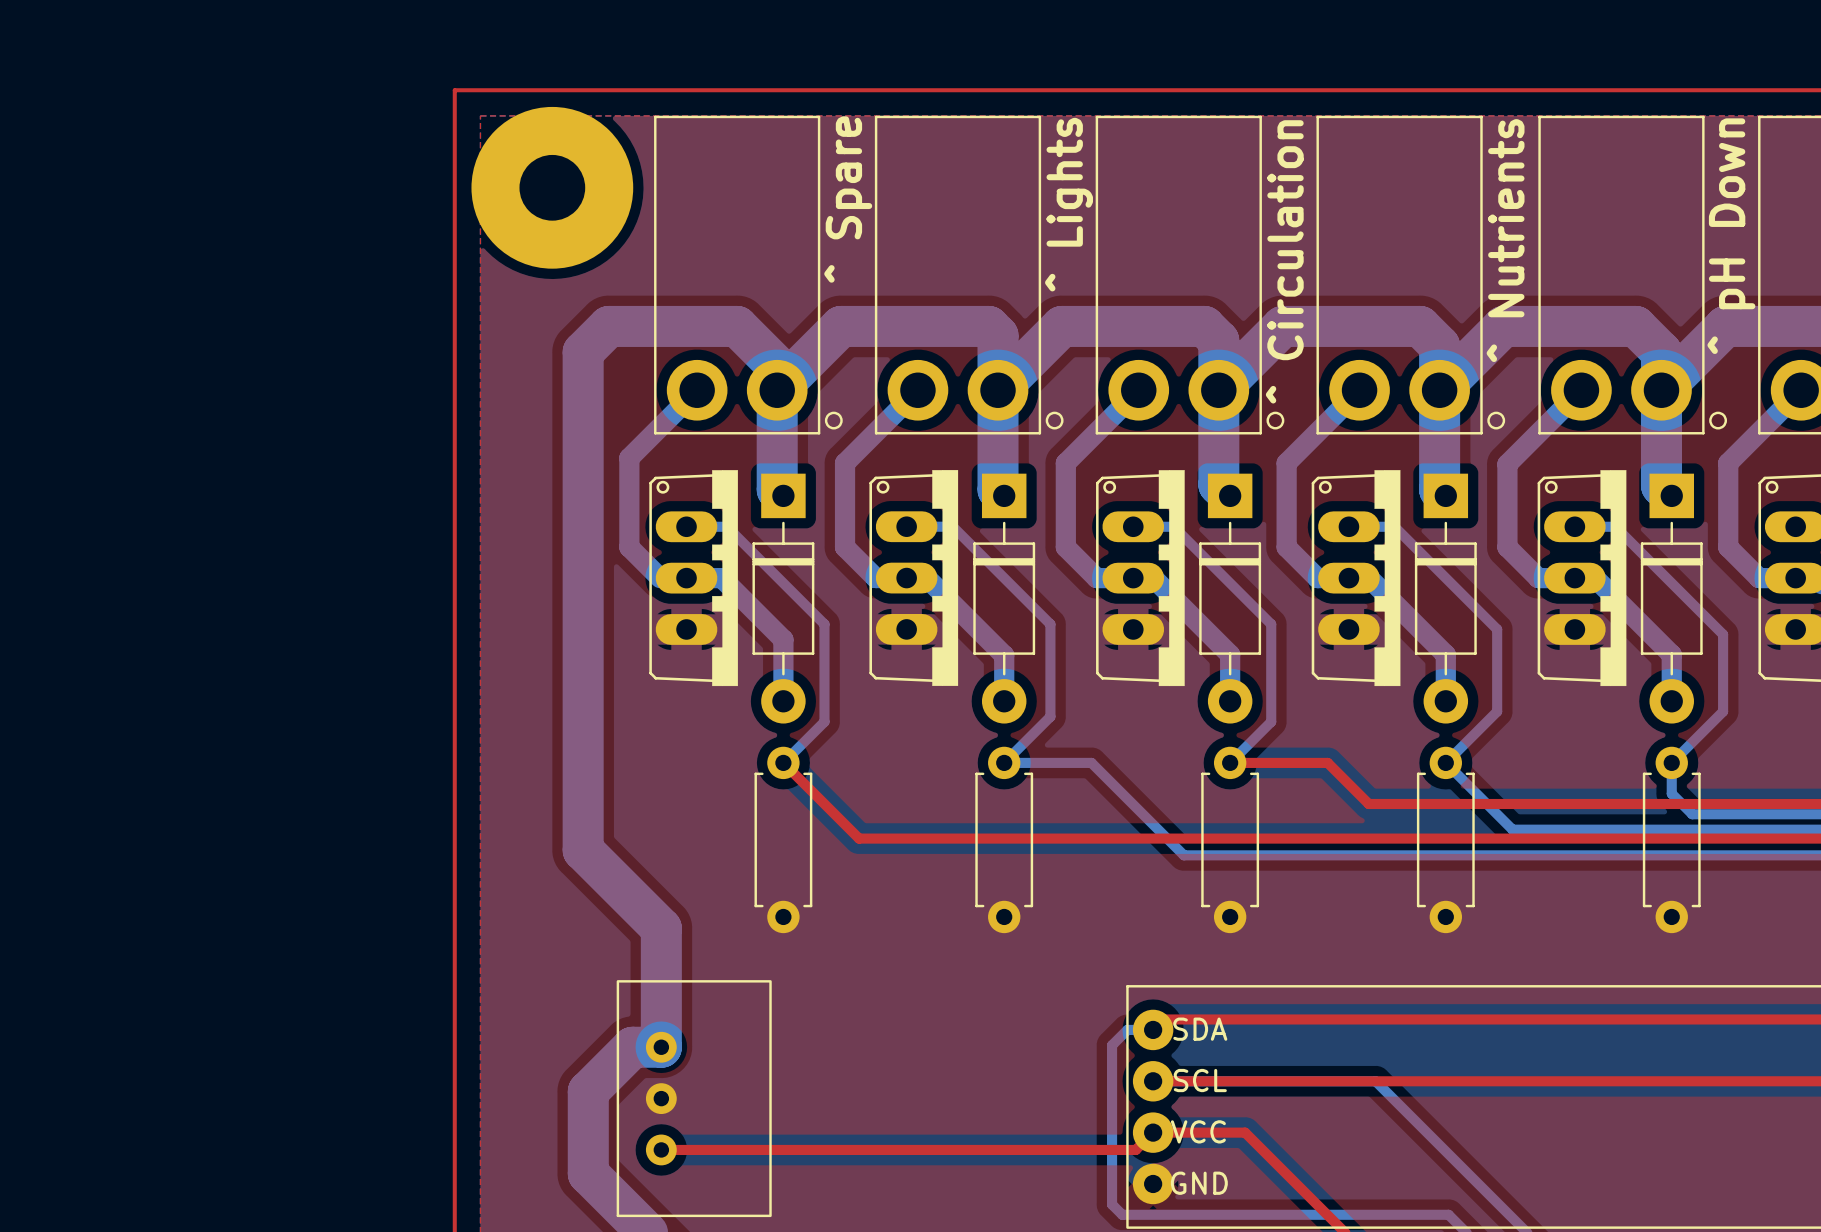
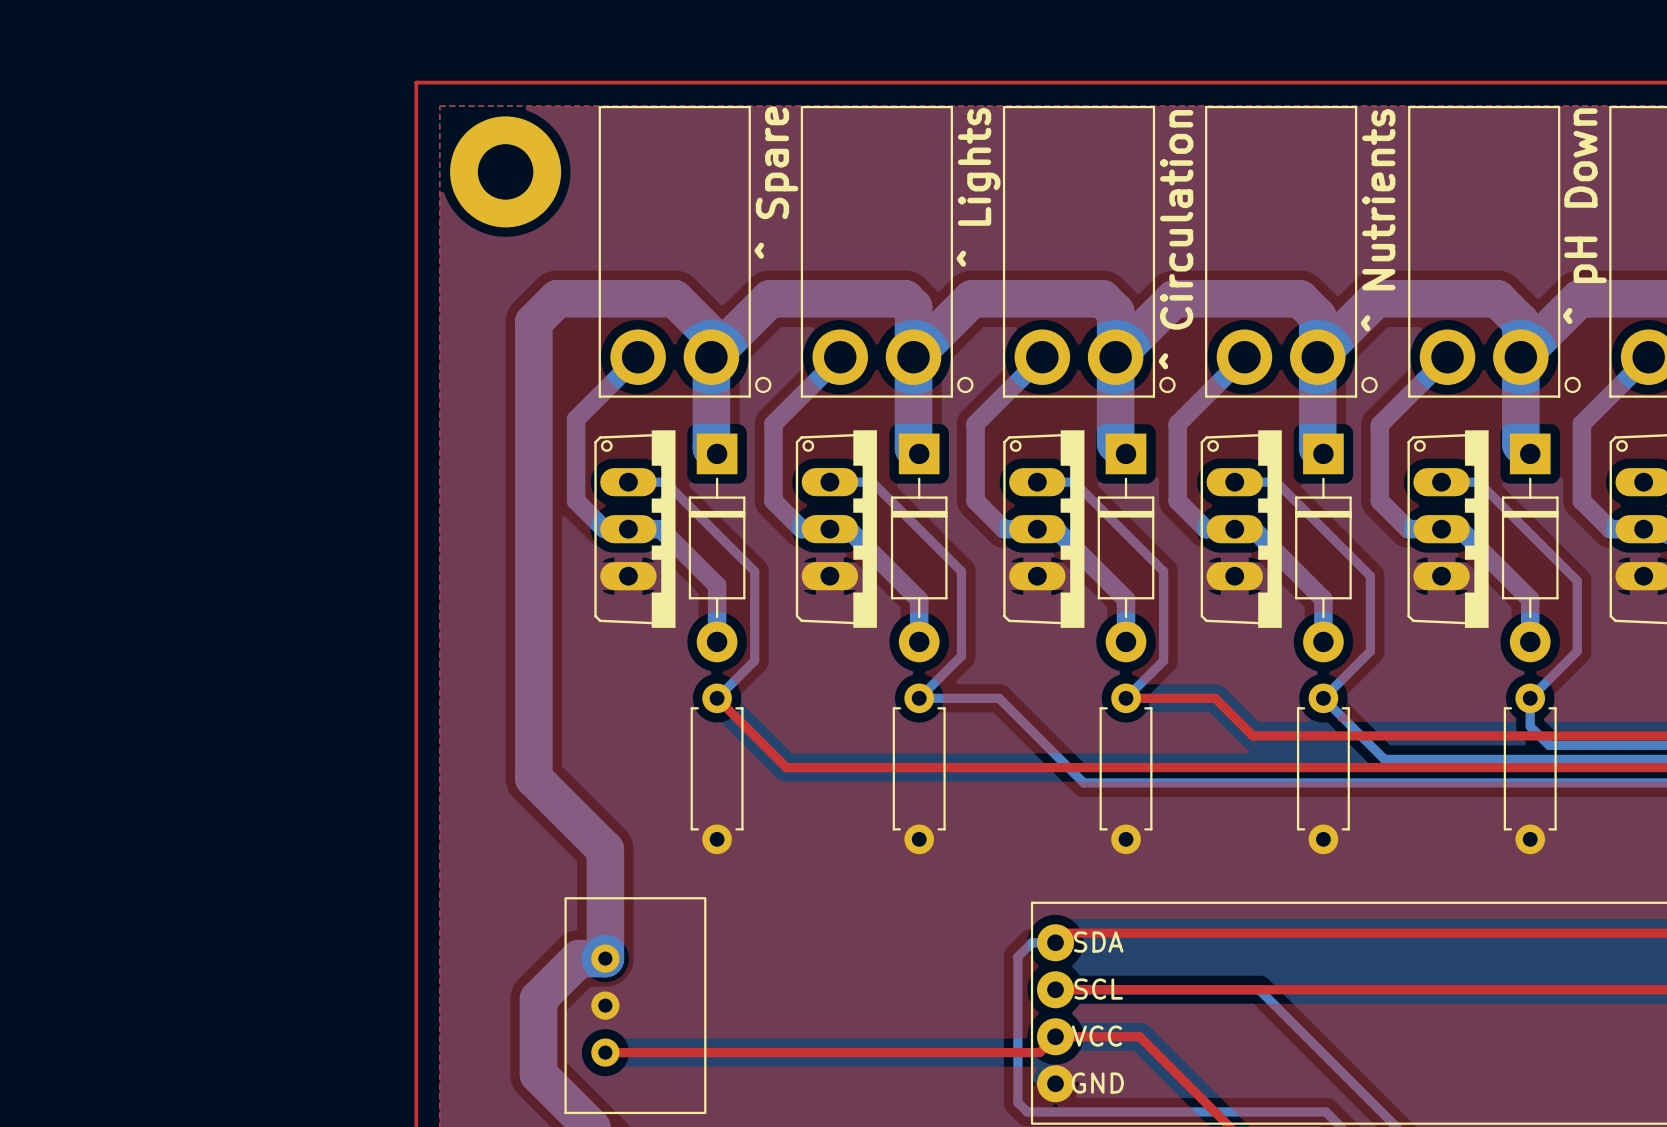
part footprint: [471, 106, 634, 269] -> [450, 116, 562, 228]

